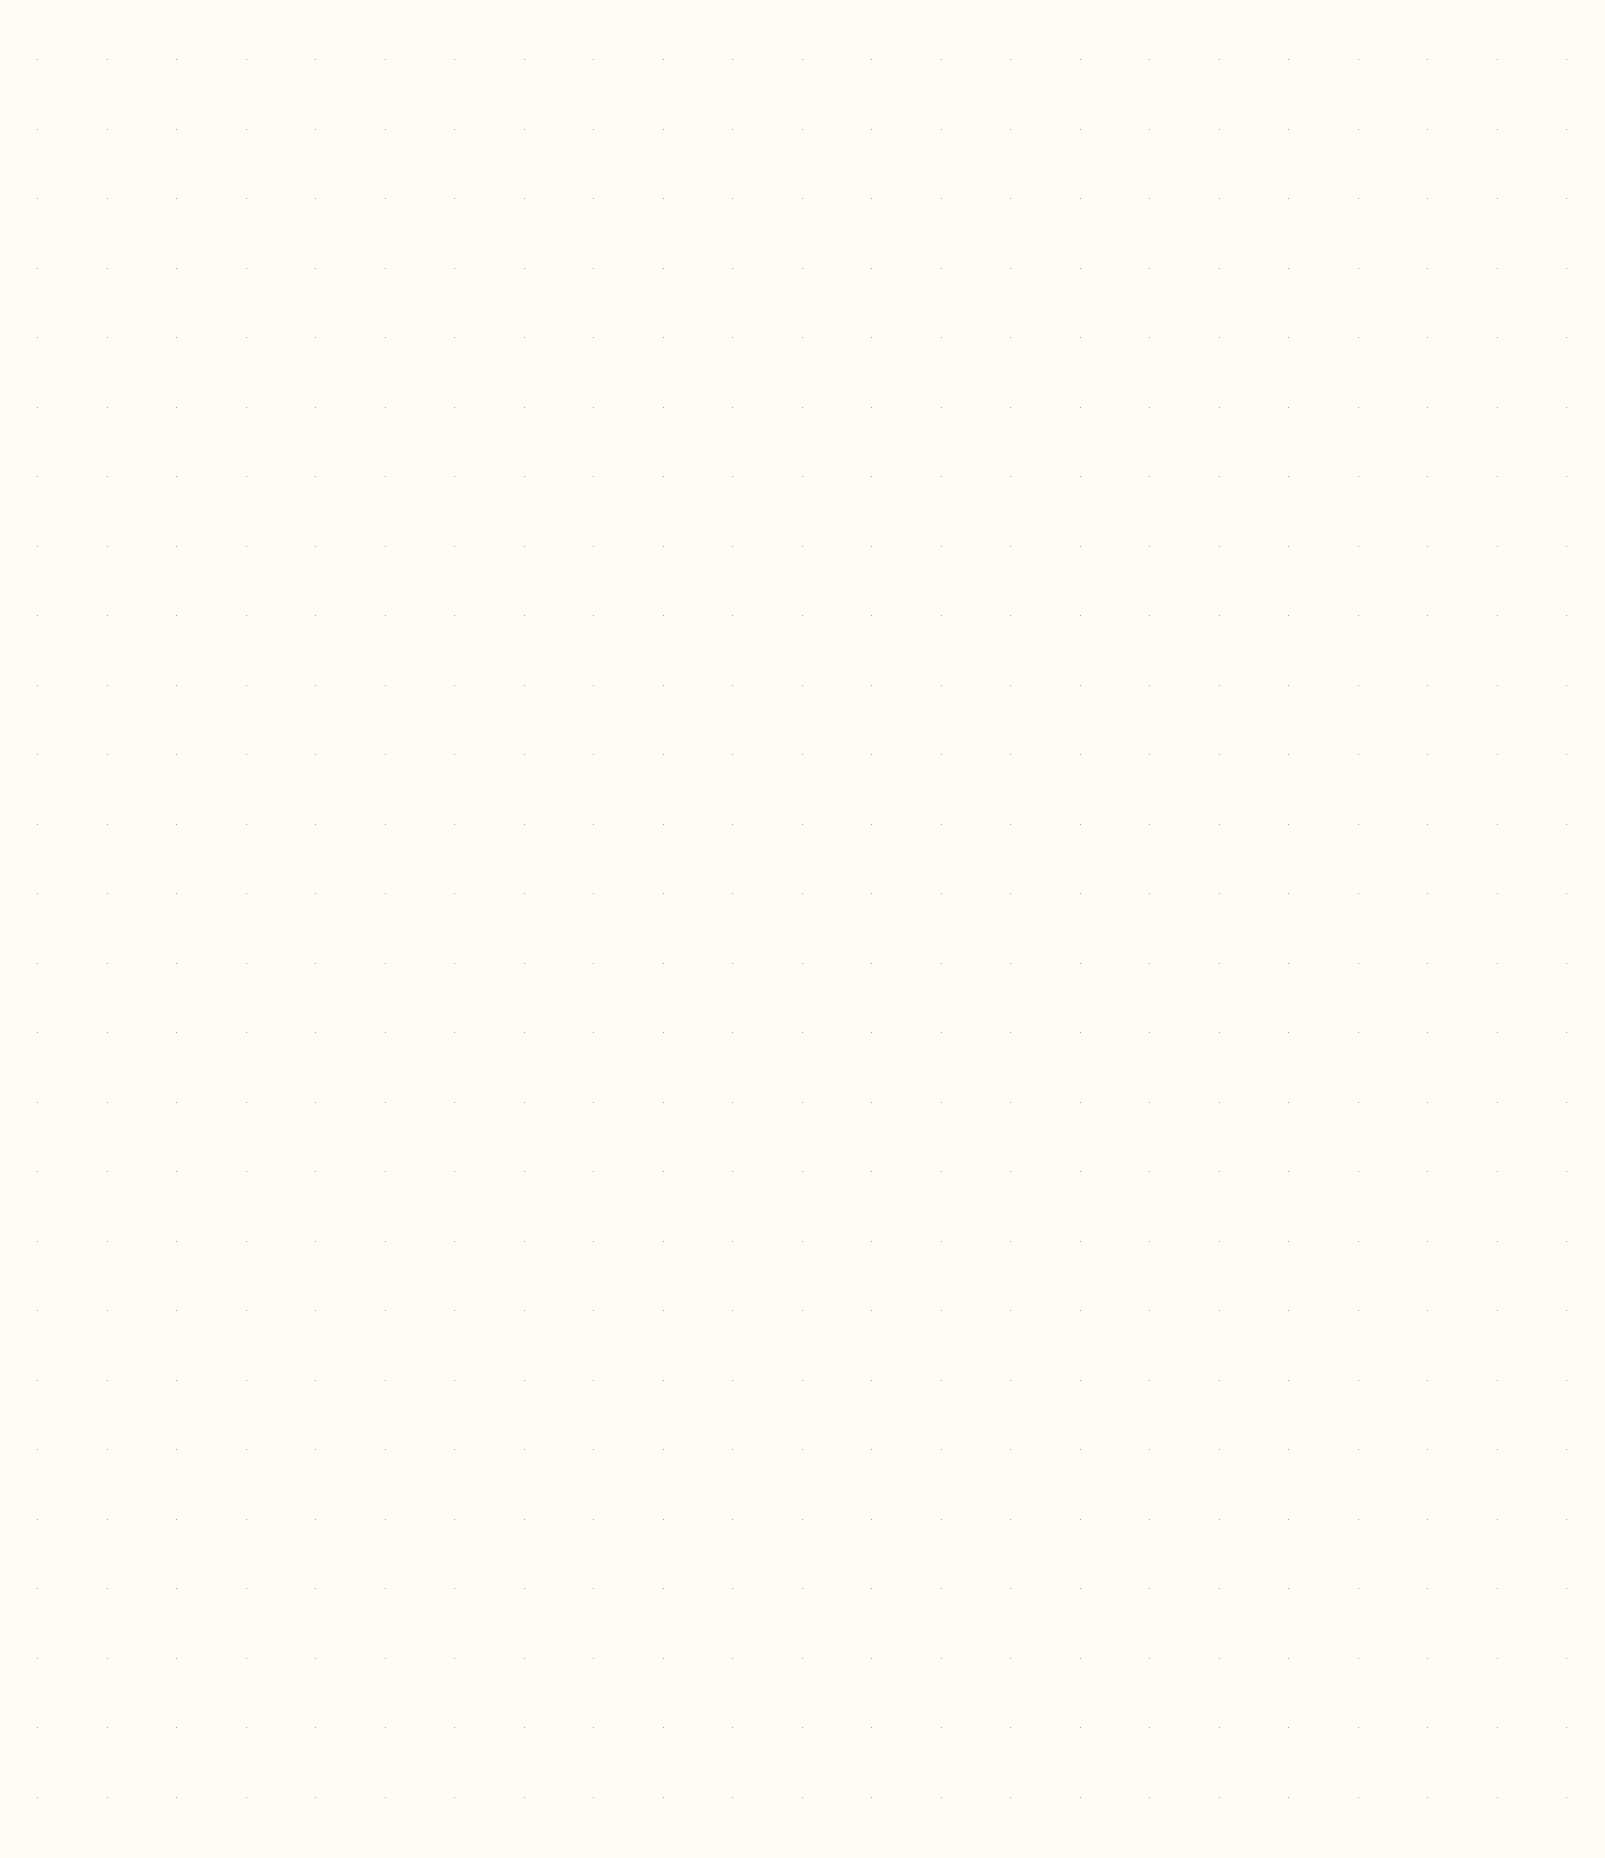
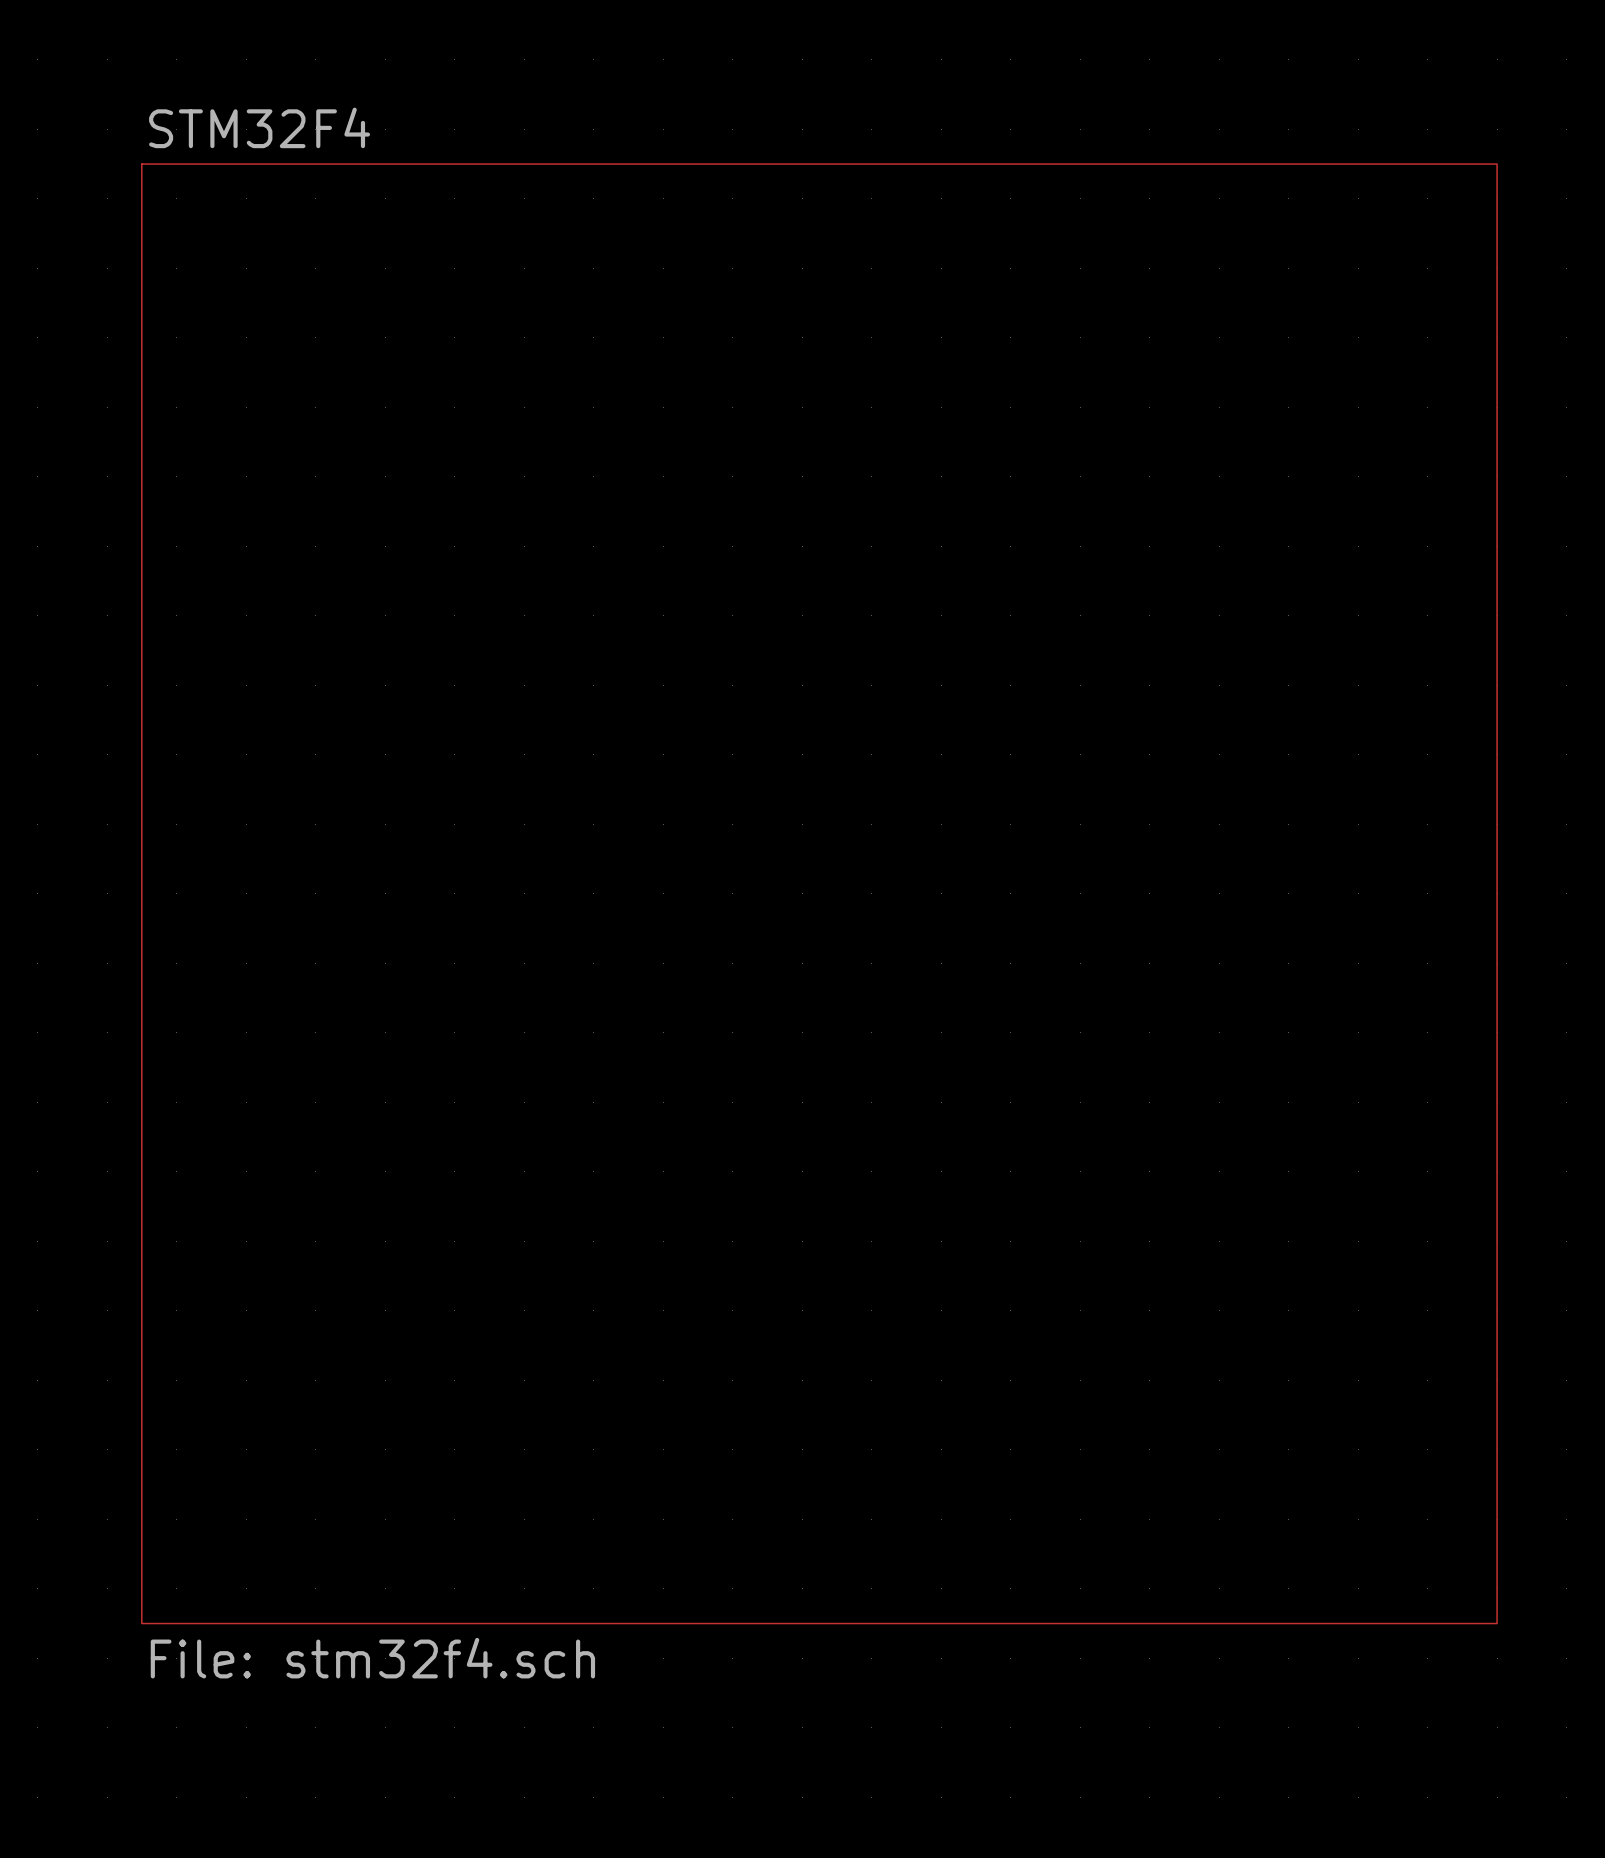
sheet STM32F4: none -> File: stm32f4.sch (819, 893)

